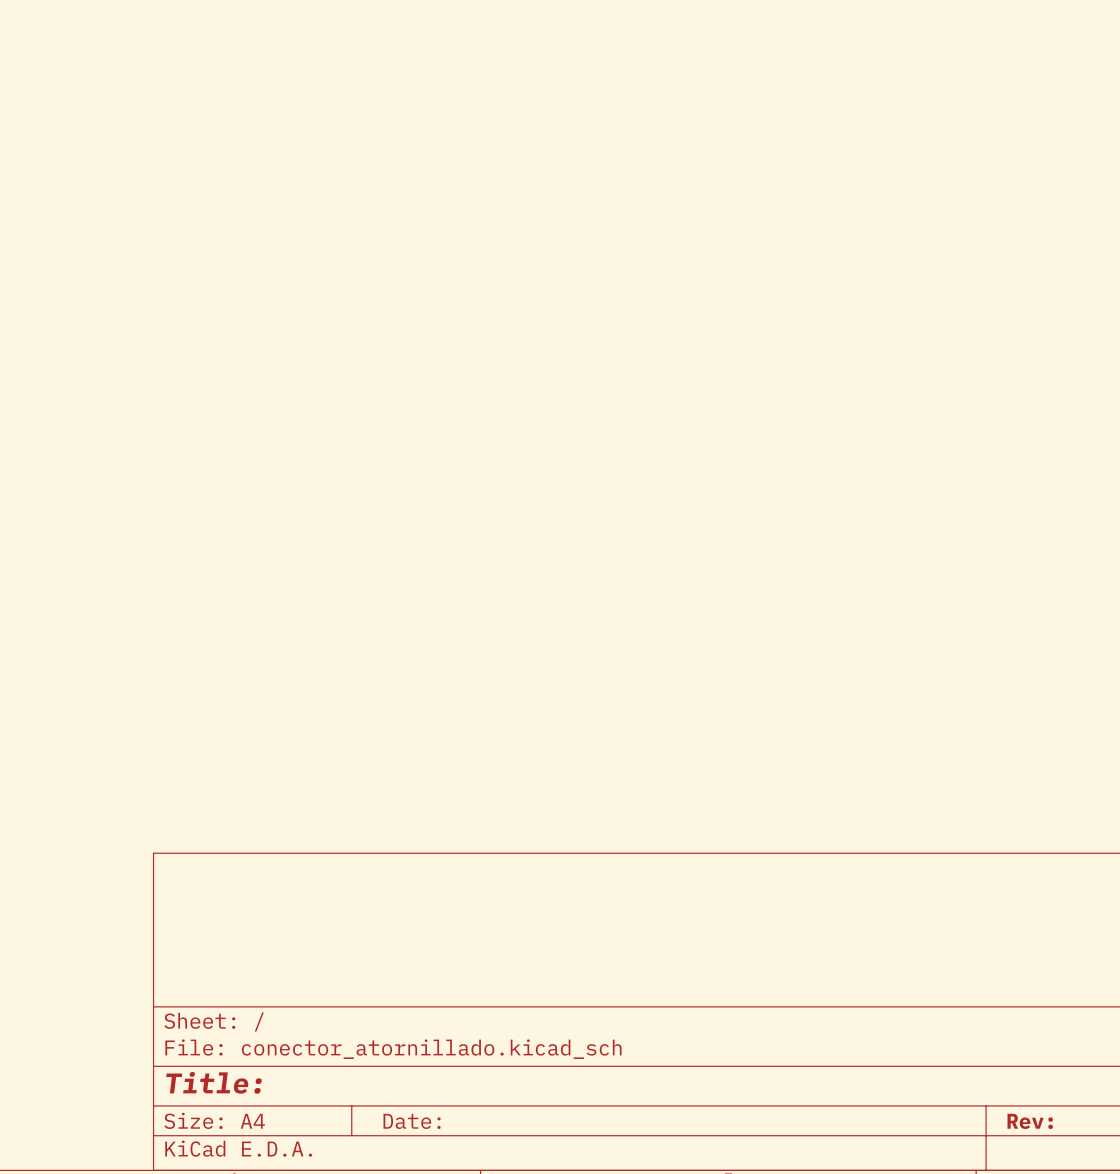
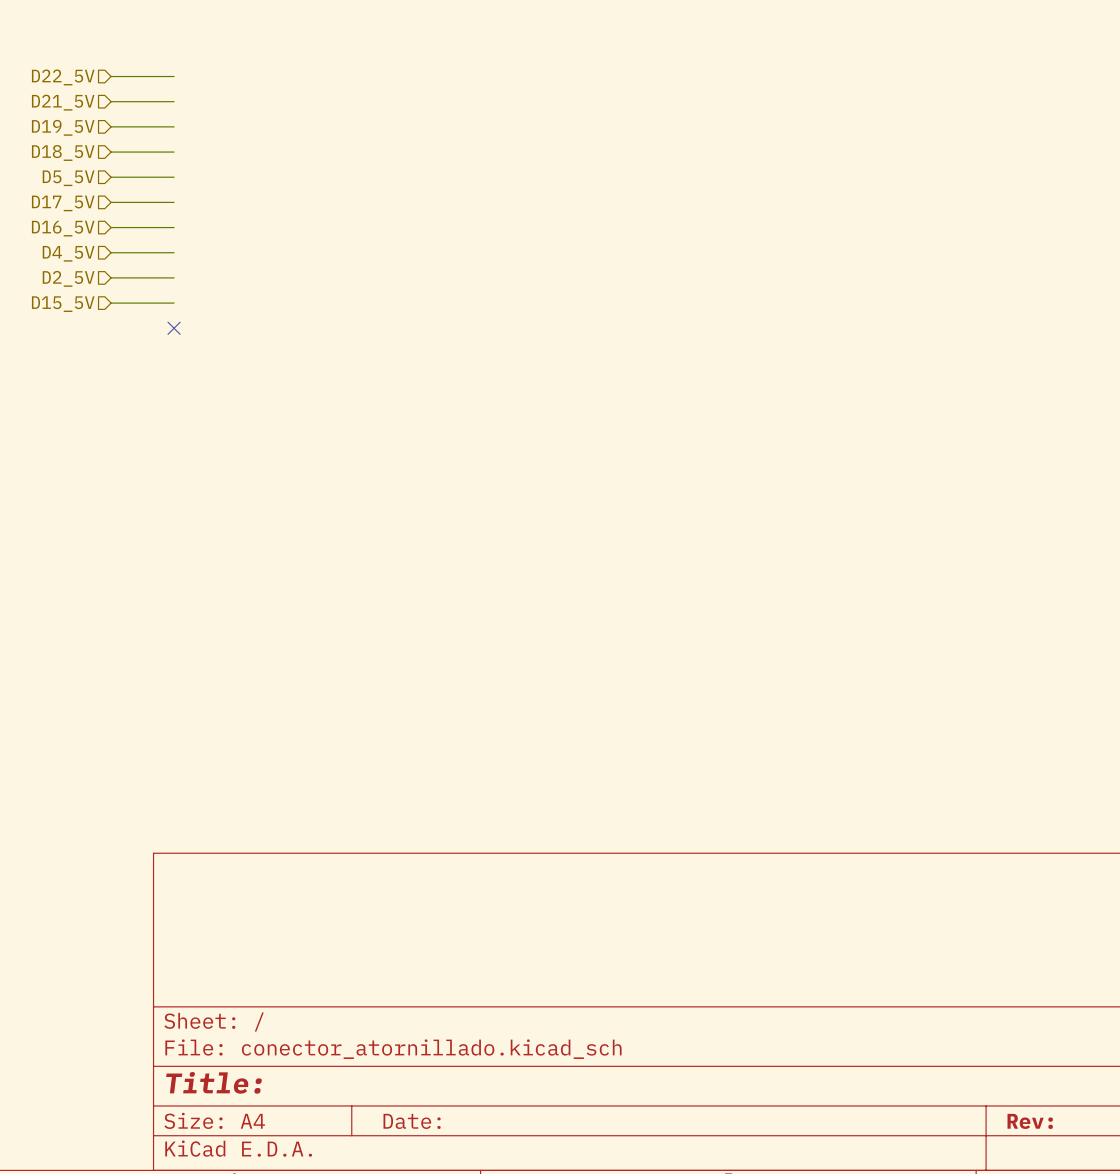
wire: none -> (111, 76) (174, 76)
hierarchical label: none -> D22_5V (63, 77)
wire: none -> (111, 101) (174, 101)
hierarchical label: none -> D21_5V (63, 102)
wire: none -> (111, 126) (174, 126)
hierarchical label: none -> D19_5V (63, 127)
hierarchical label: none -> D18_5V (63, 152)
wire: none -> (111, 152) (174, 152)
wire: none -> (111, 177) (174, 177)
hierarchical label: none -> D5_5V (68, 178)
wire: none -> (111, 202) (174, 202)
hierarchical label: none -> D17_5V (63, 203)
wire: none -> (111, 227) (174, 227)
hierarchical label: none -> D16_5V (63, 228)
wire: none -> (111, 252) (174, 252)
hierarchical label: none -> D4_5V (68, 253)
wire: none -> (111, 277) (174, 277)
hierarchical label: none -> D2_5V (68, 278)
wire: none -> (111, 303) (174, 303)
hierarchical label: none -> D15_5V (63, 304)
no-connect mark: none -> (174, 328)

